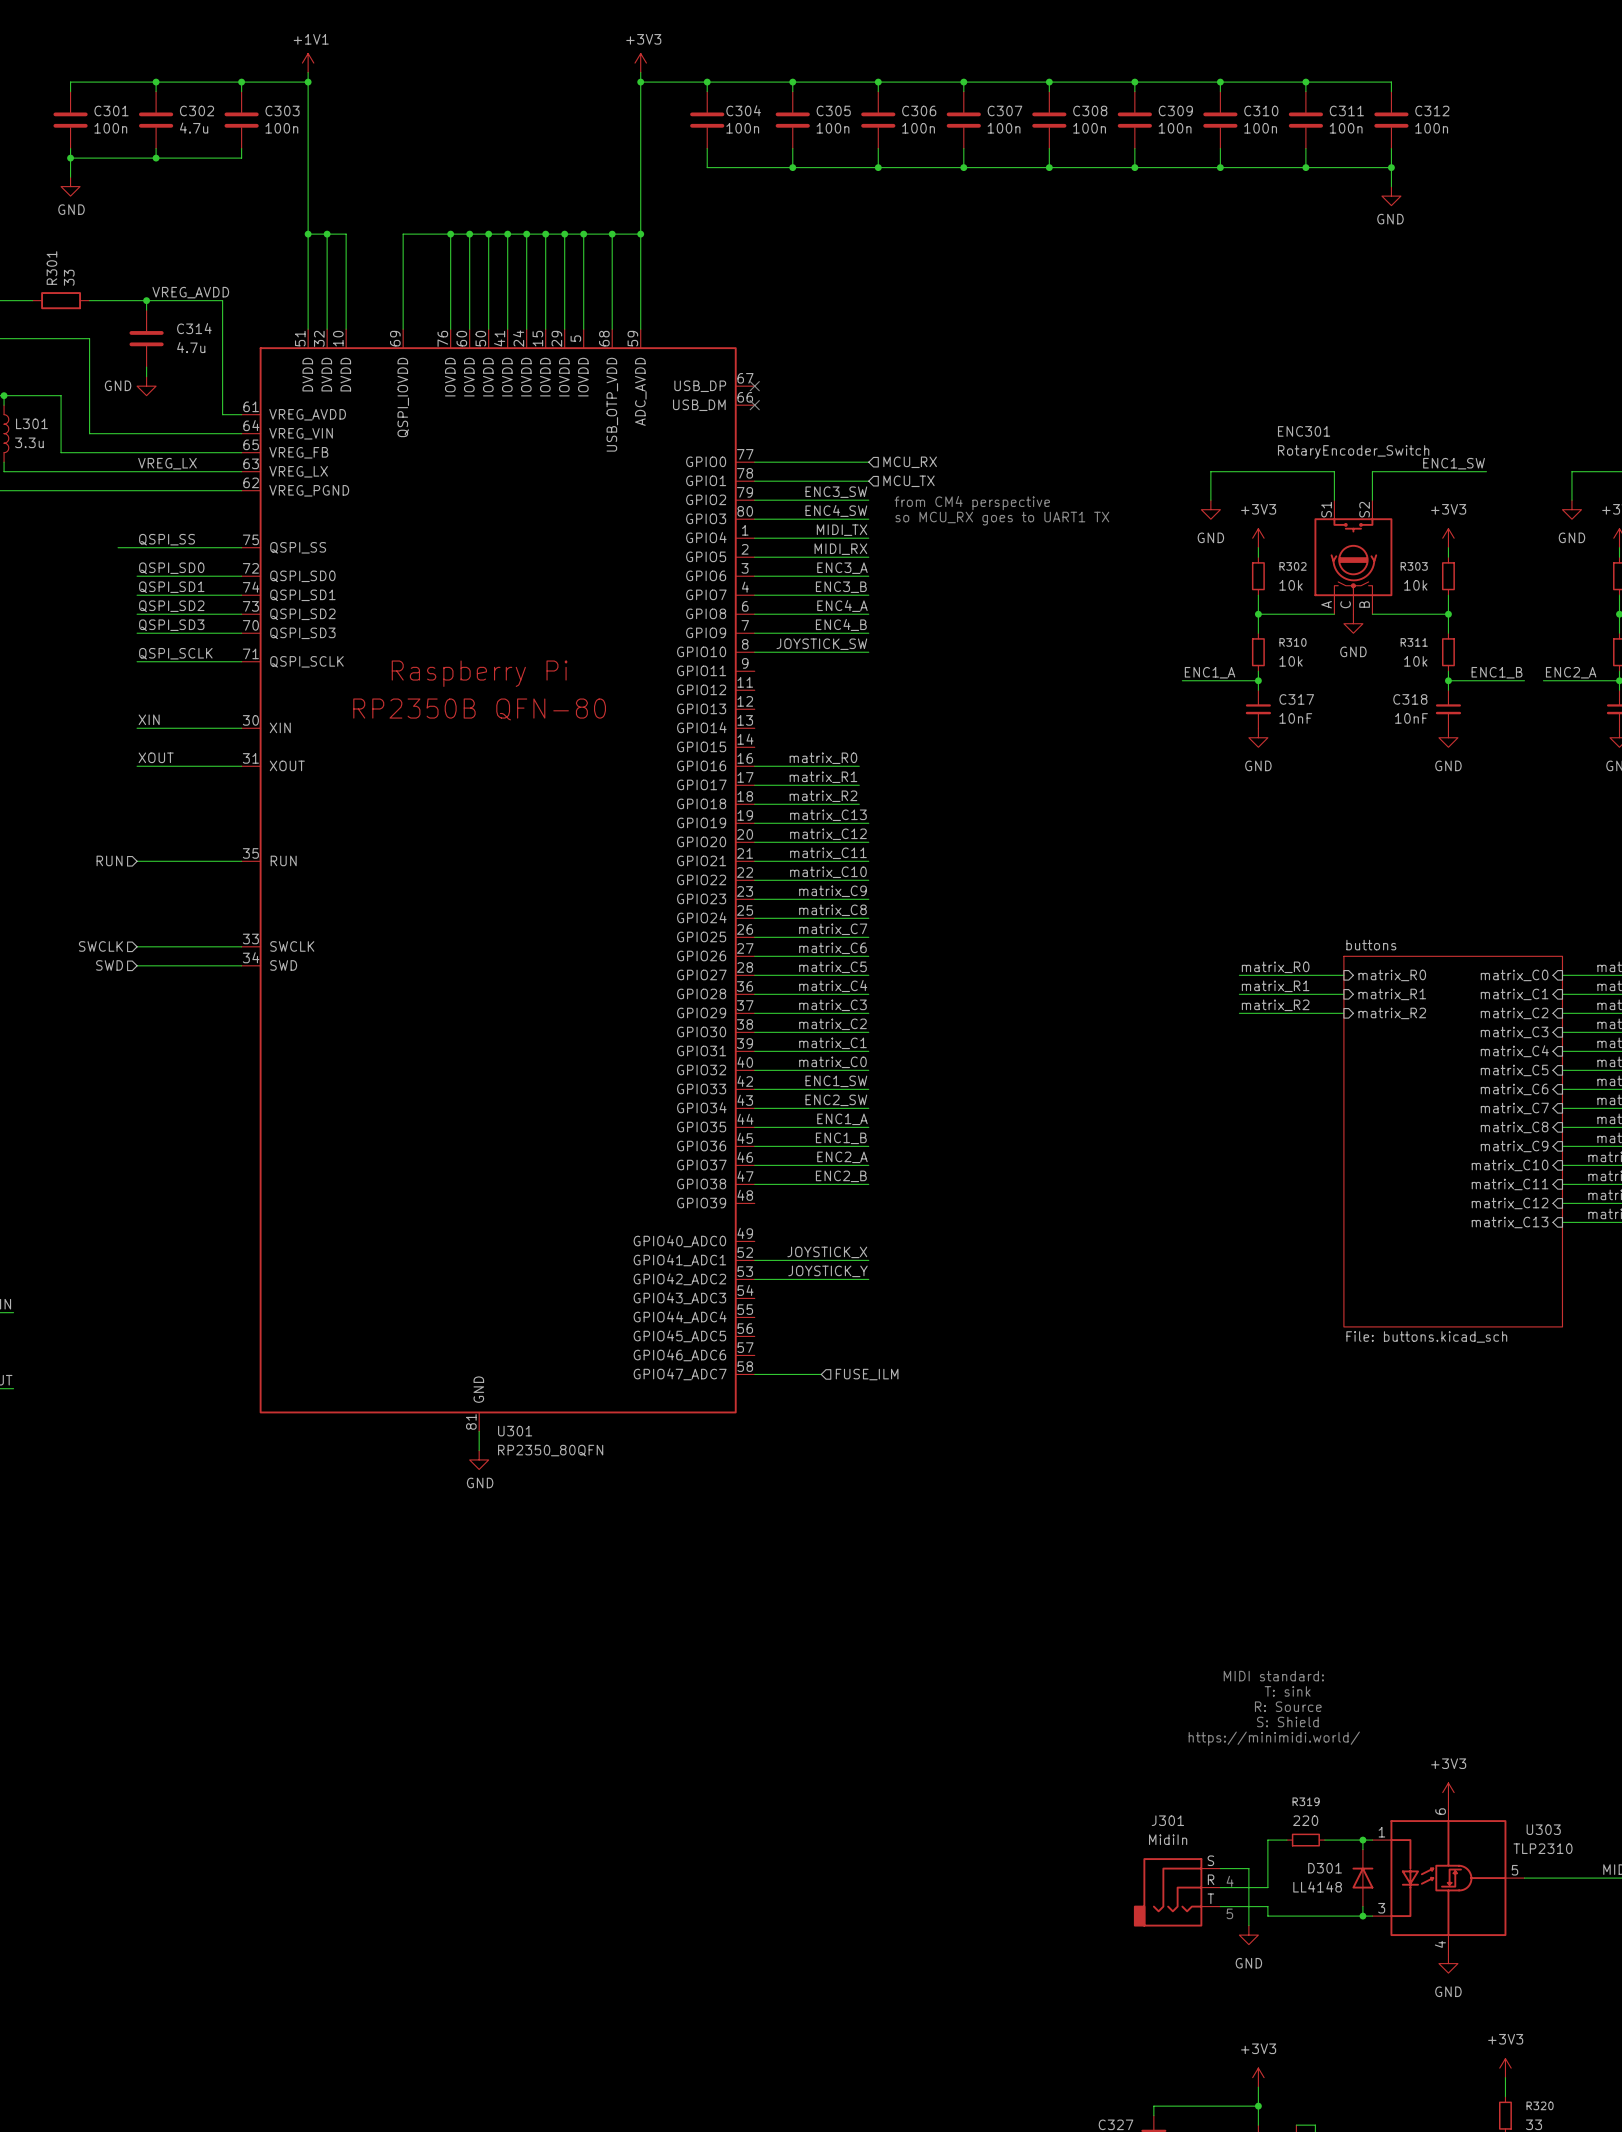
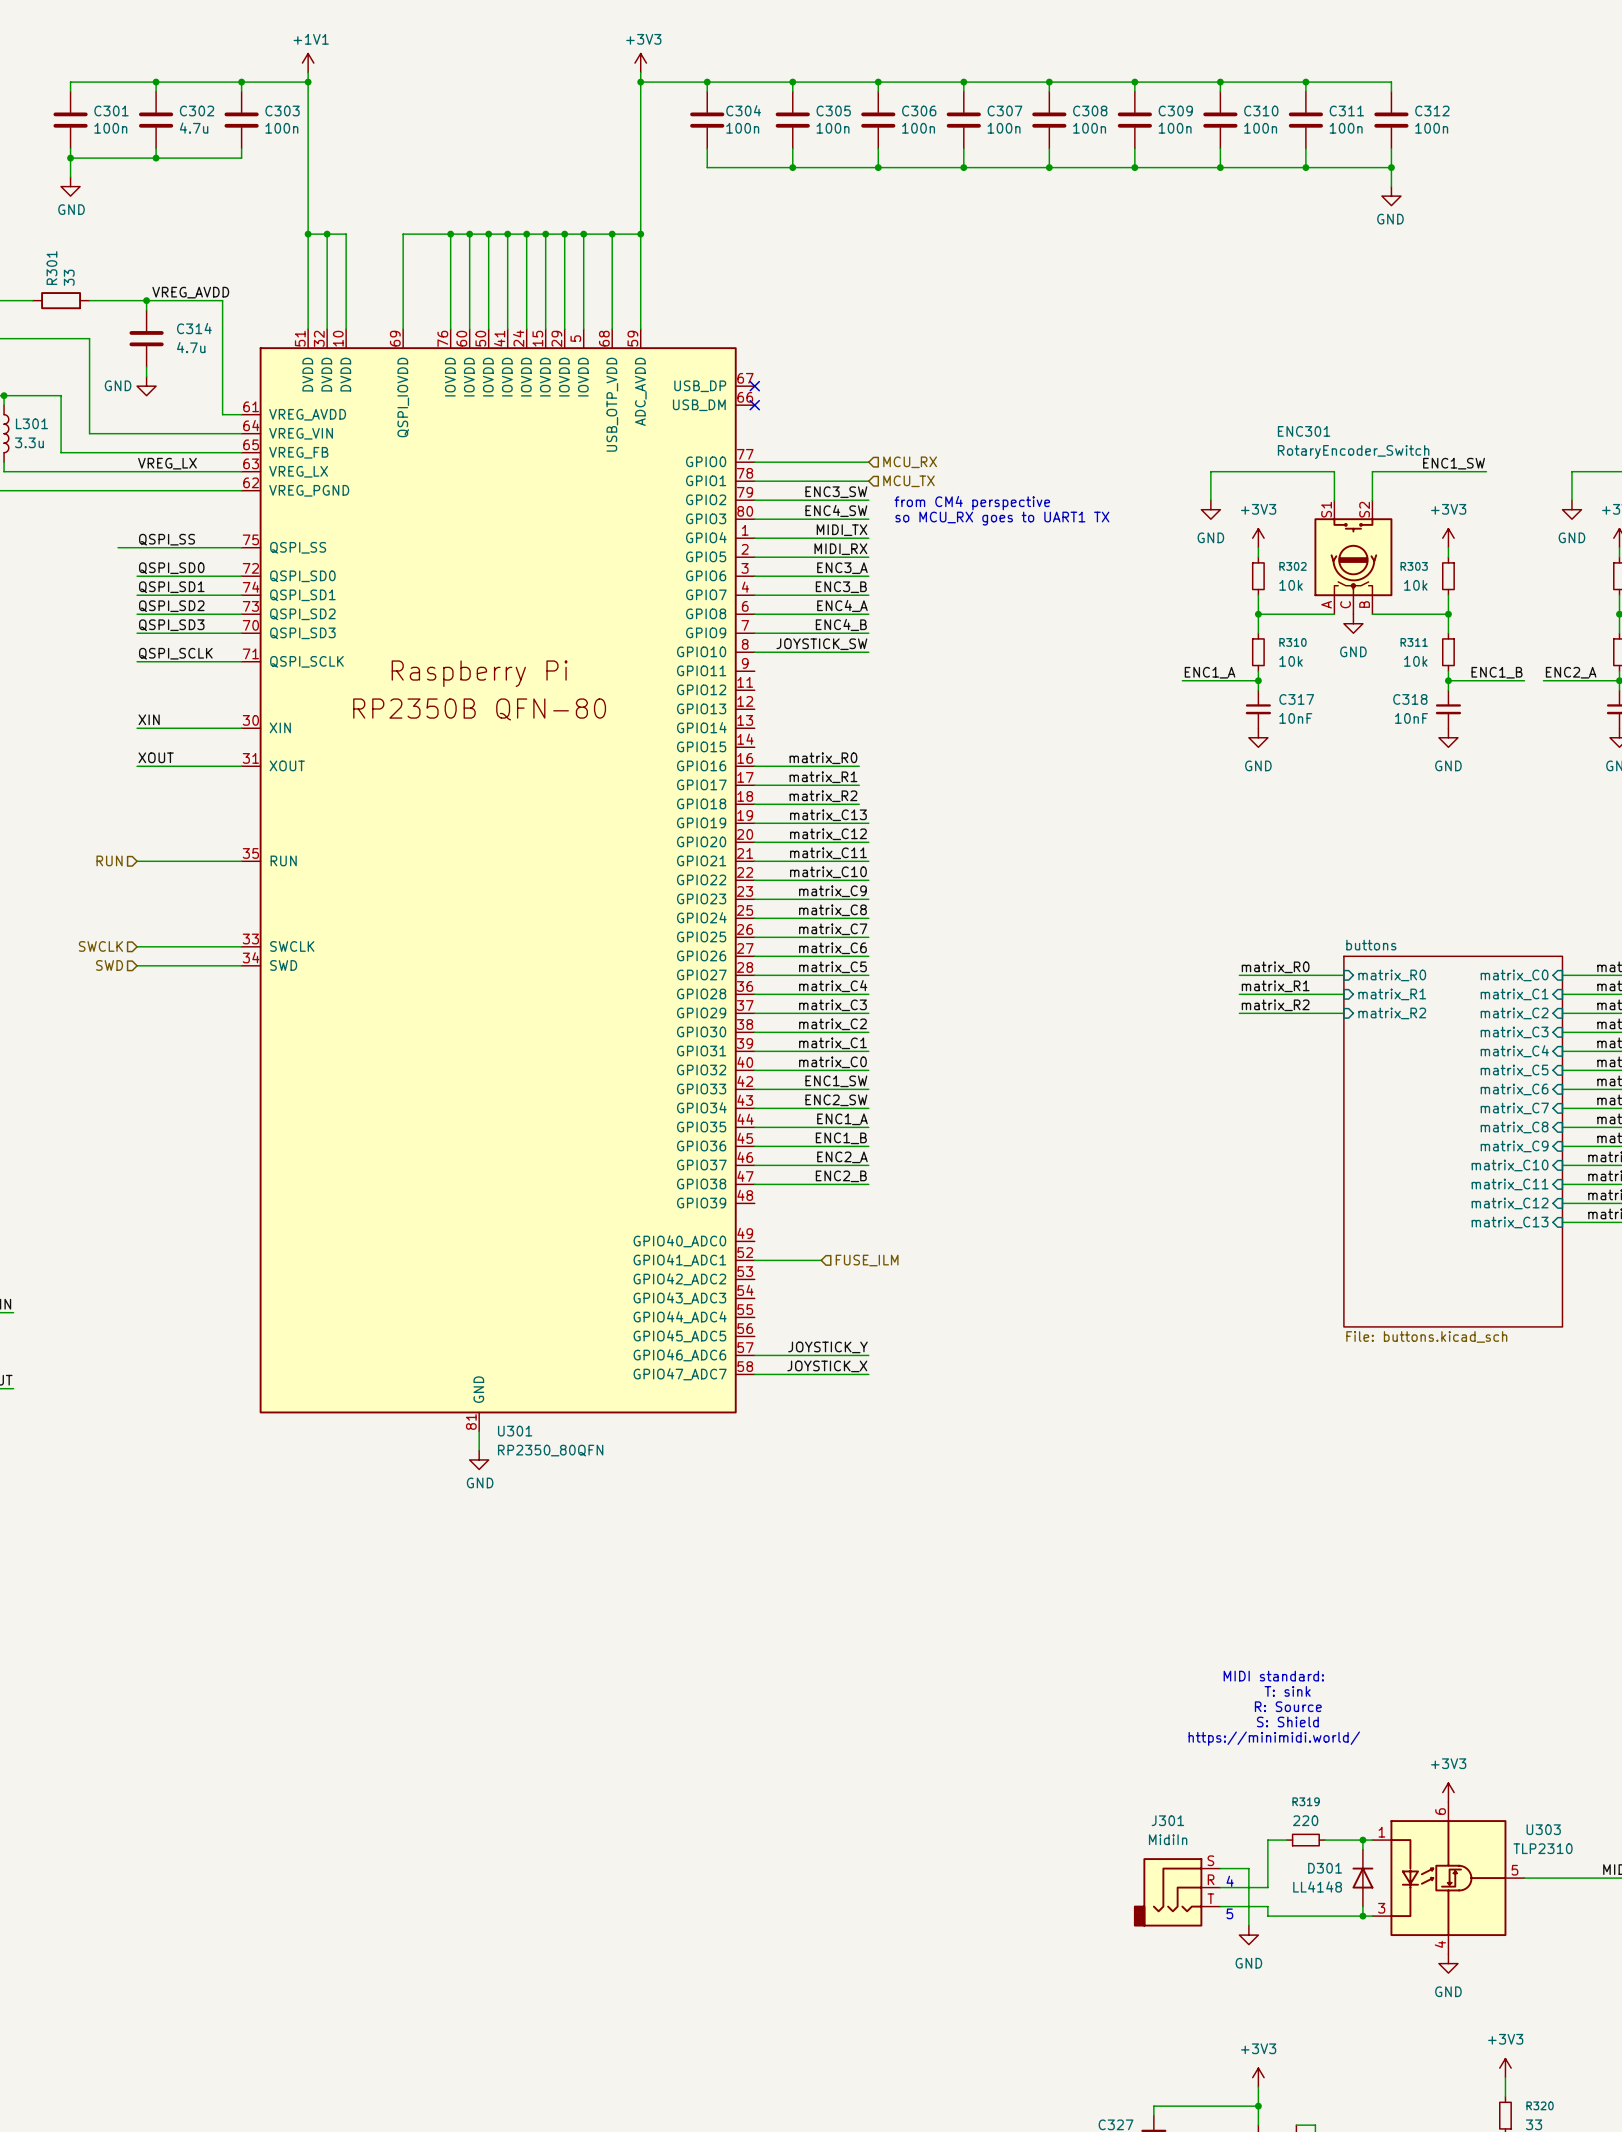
label position: JOYSTICK_X (827, 1252) -> JOYSTICK_X (827, 1366)
wire: (821, 1260) (868, 1260) -> (821, 1374) (868, 1374)
label position: JOYSTICK_Y (827, 1271) -> JOYSTICK_Y (827, 1347)
wire: (754, 1279) (868, 1279) -> (754, 1355) (868, 1355)
hierarchical label position: FUSE_ILM (867, 1374) -> FUSE_ILM (867, 1260)

